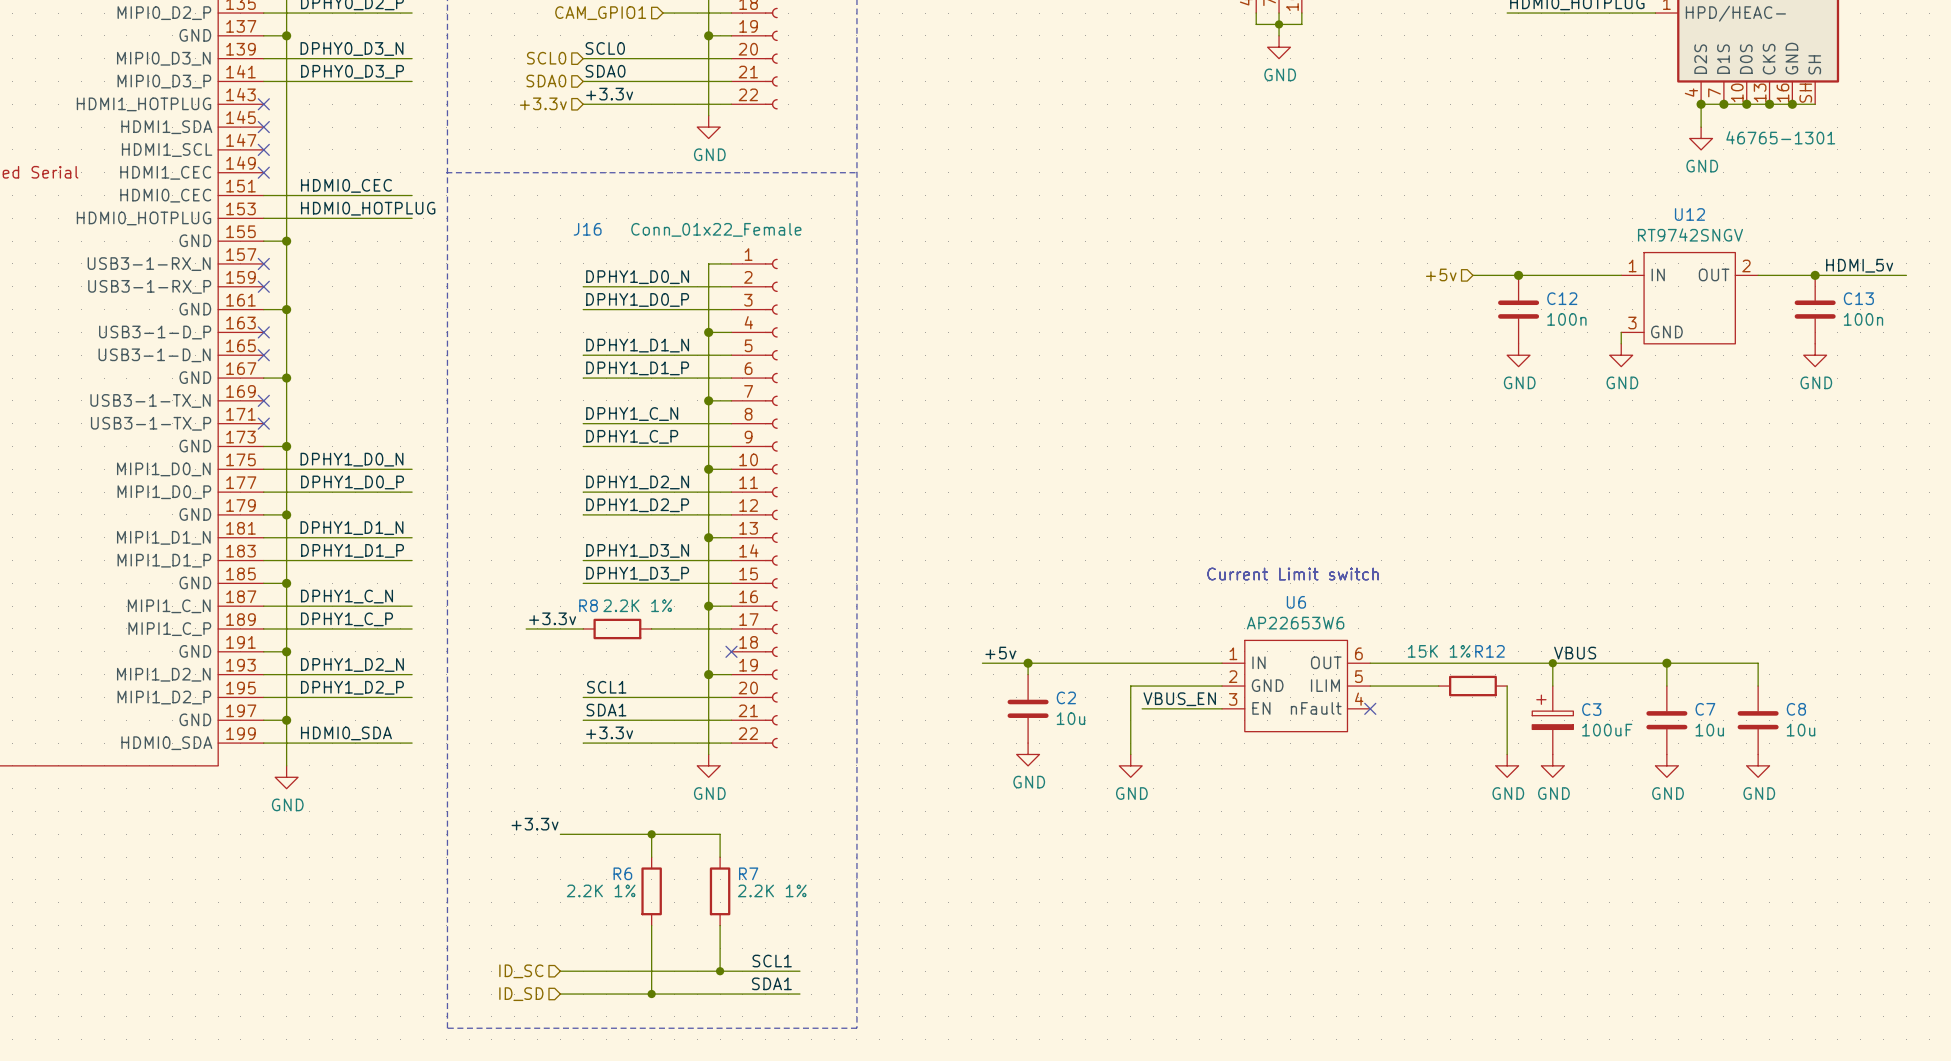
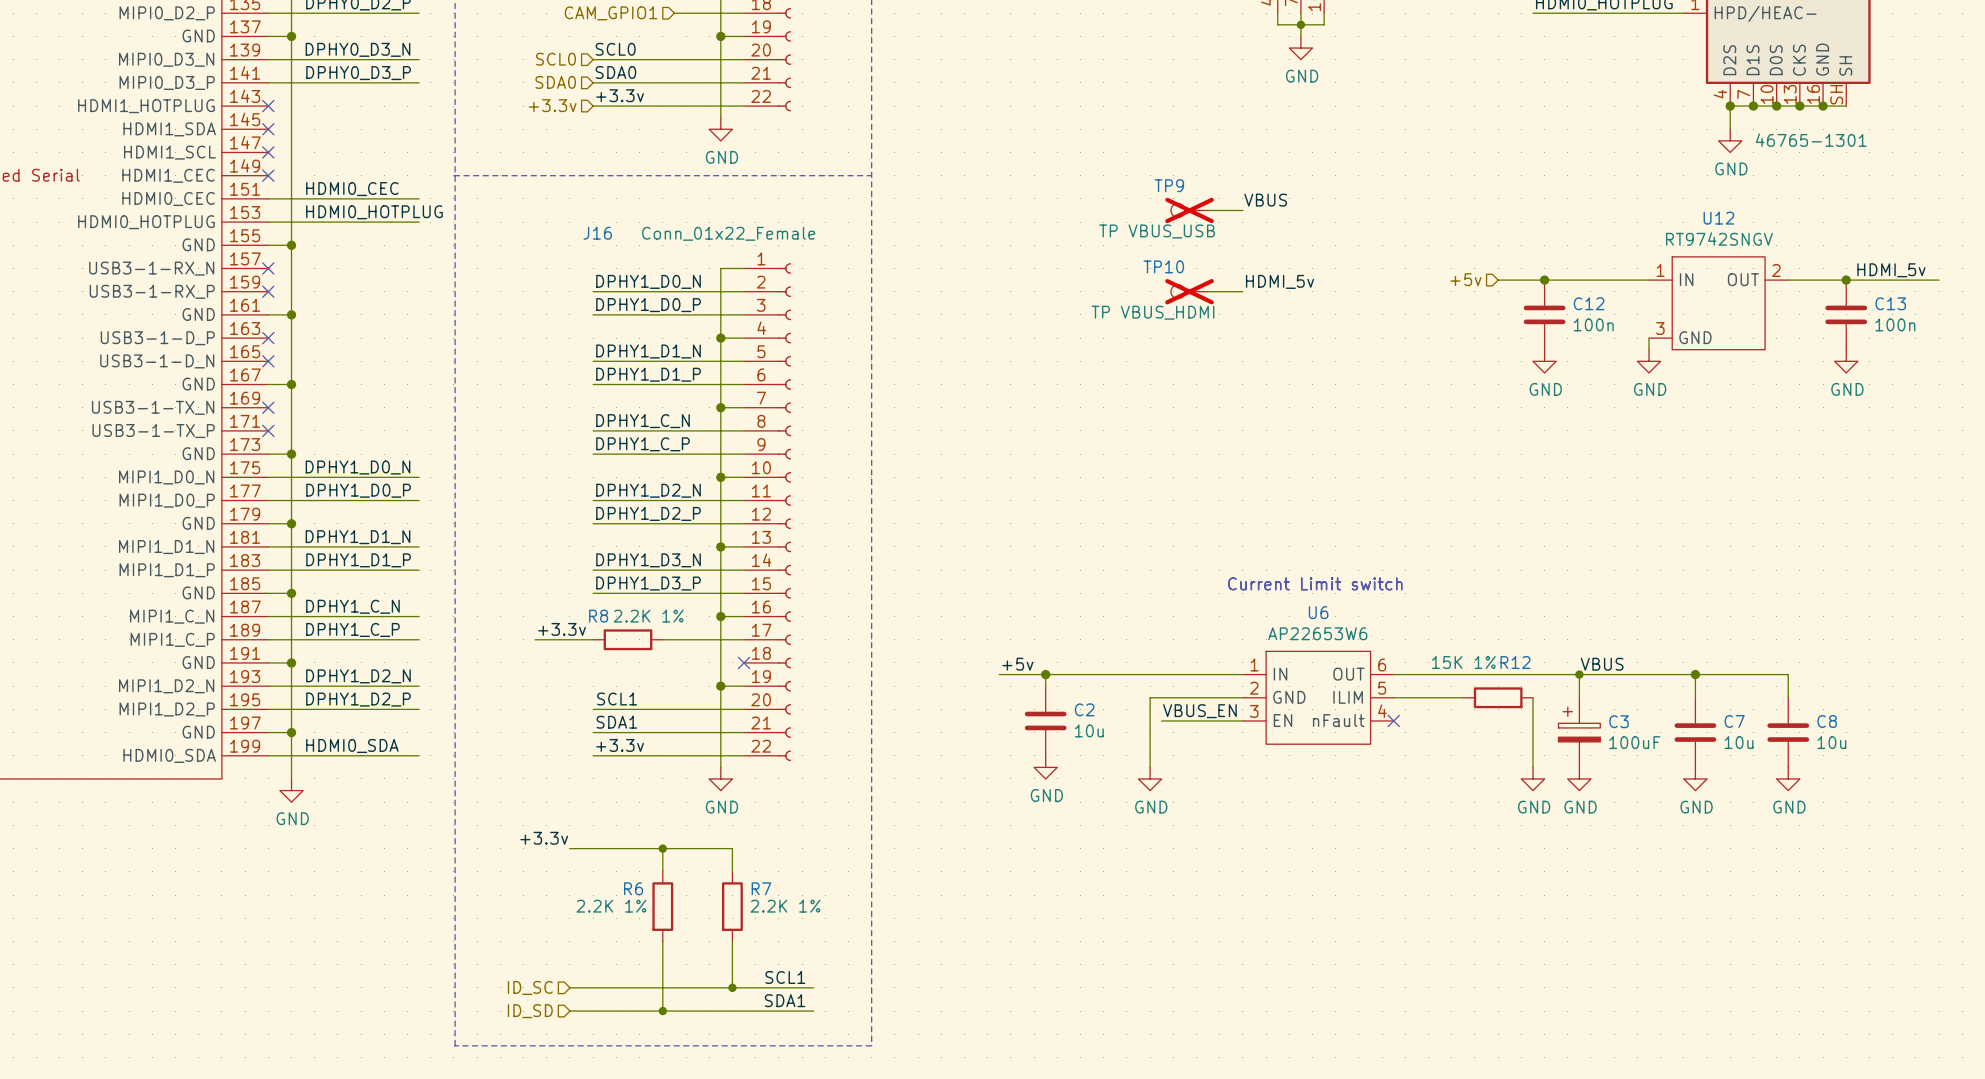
label: none -> VBUS (1265, 200)
TP9: none -> TP VBUS_USB (1189, 210)
wire: none -> (1208, 210) (1242, 210)
label: none -> HDMI_5v (1280, 281)
TP10: none -> TP VBUS_HDMI (1189, 291)
wire: none -> (1208, 291) (1242, 291)

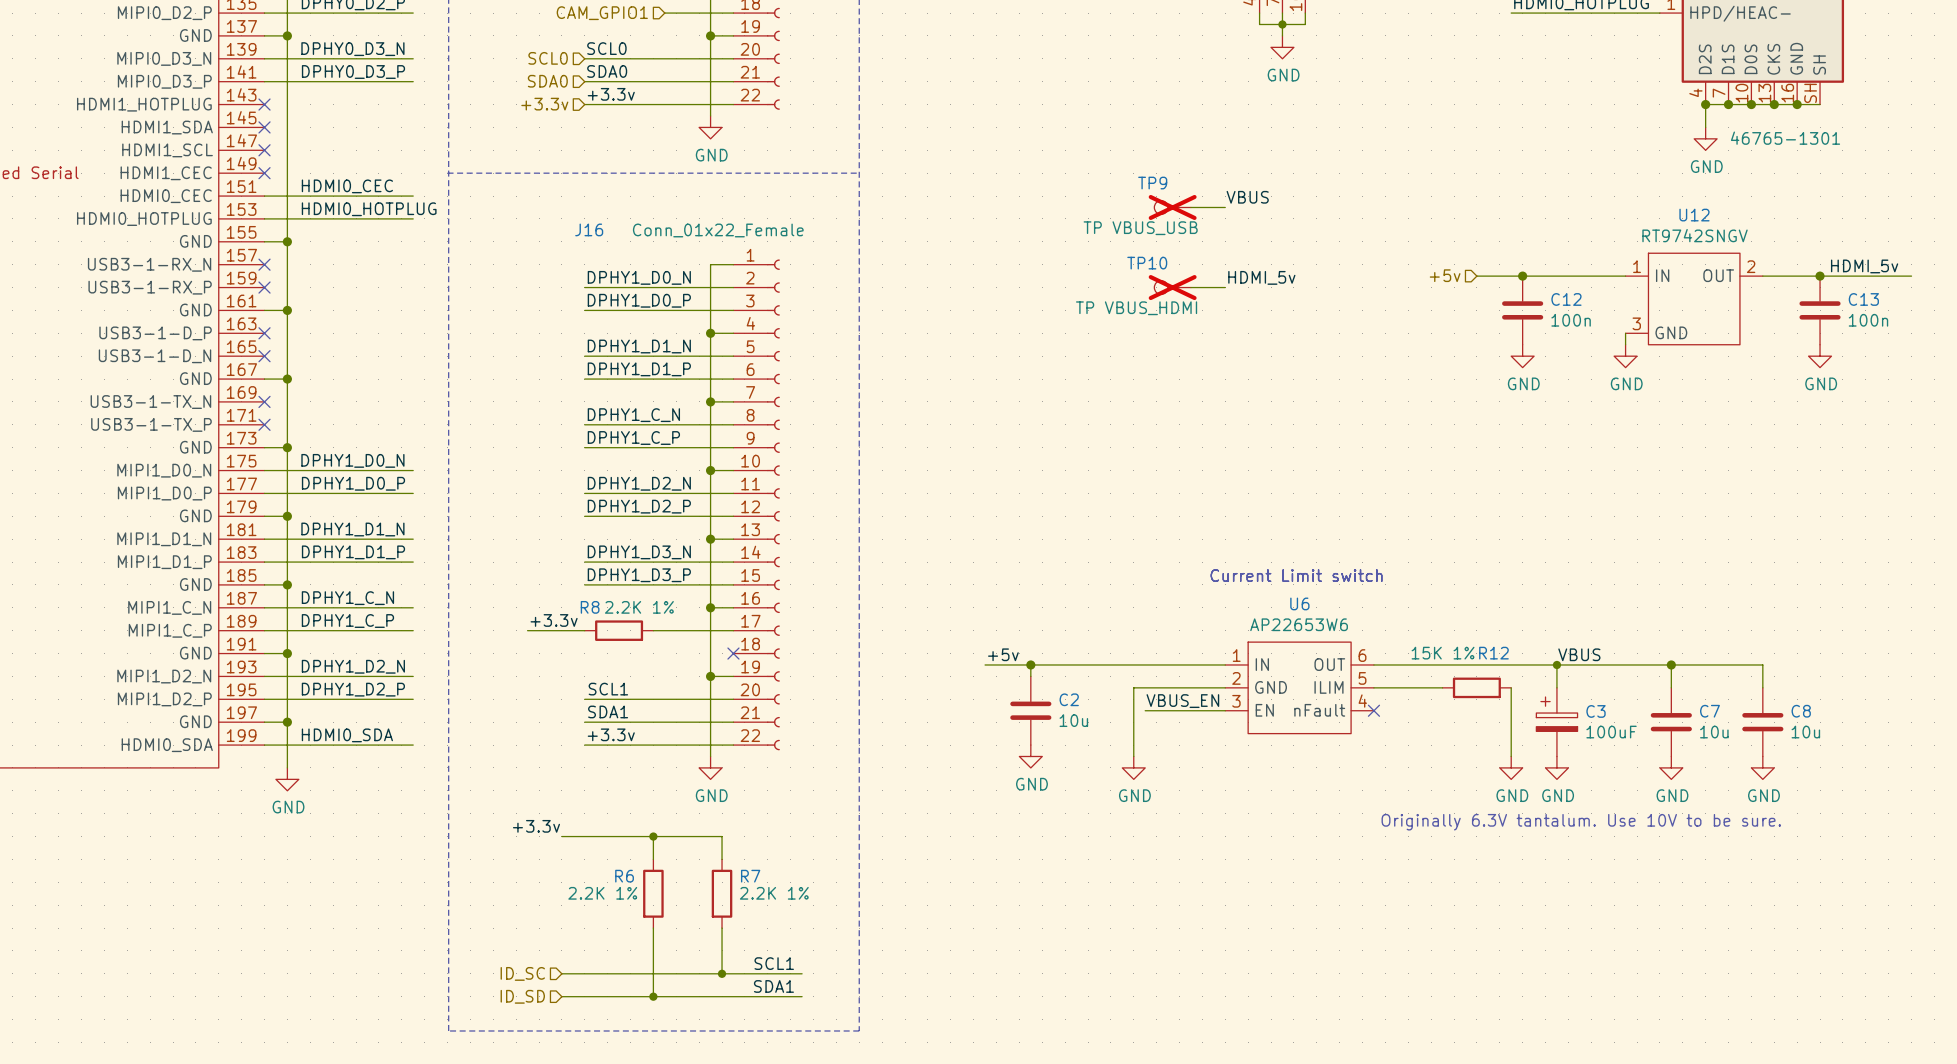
text: none -> Originally 6.3V tantalum. Use 10V to be sure. (1581, 822)

